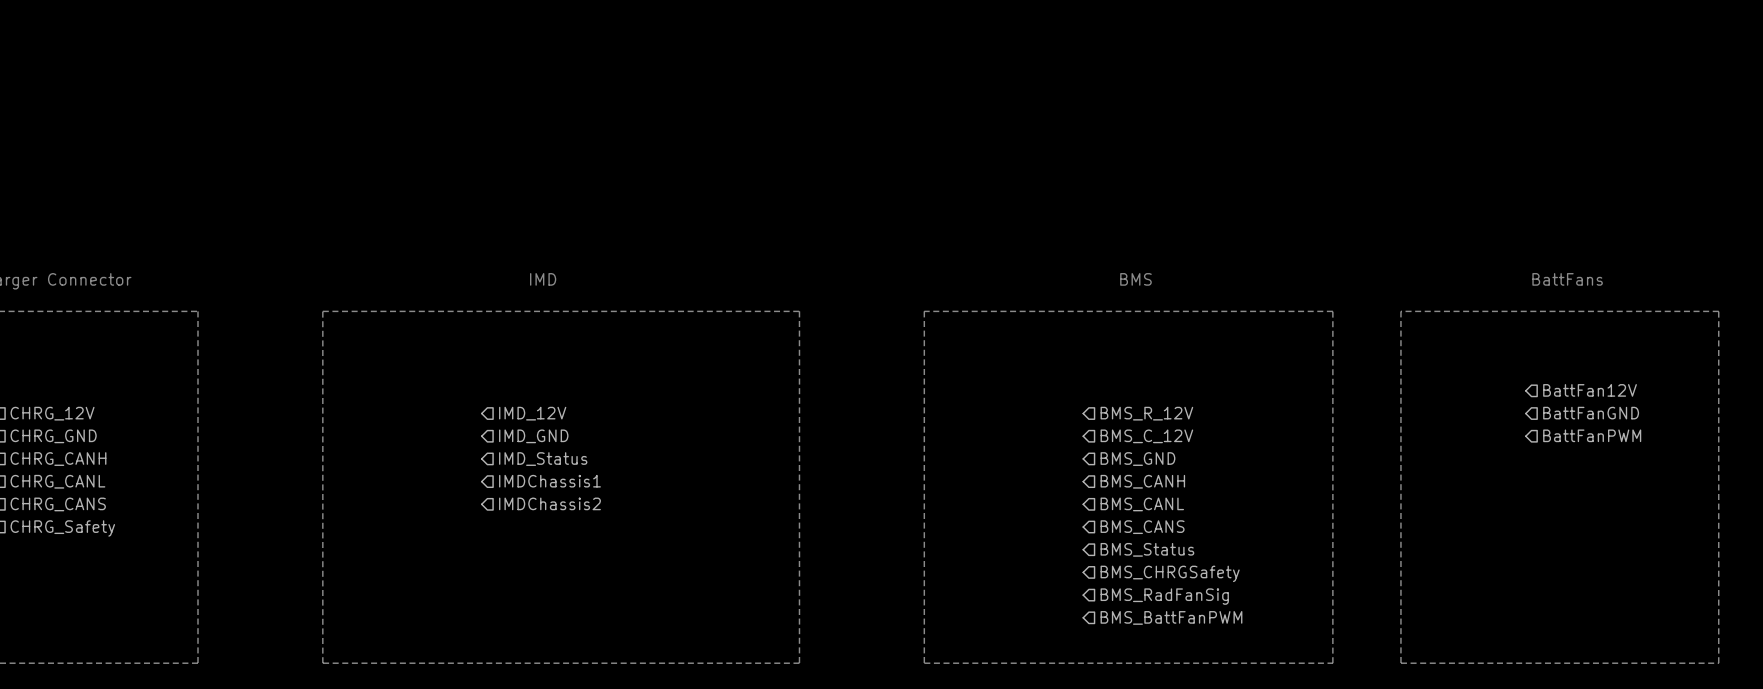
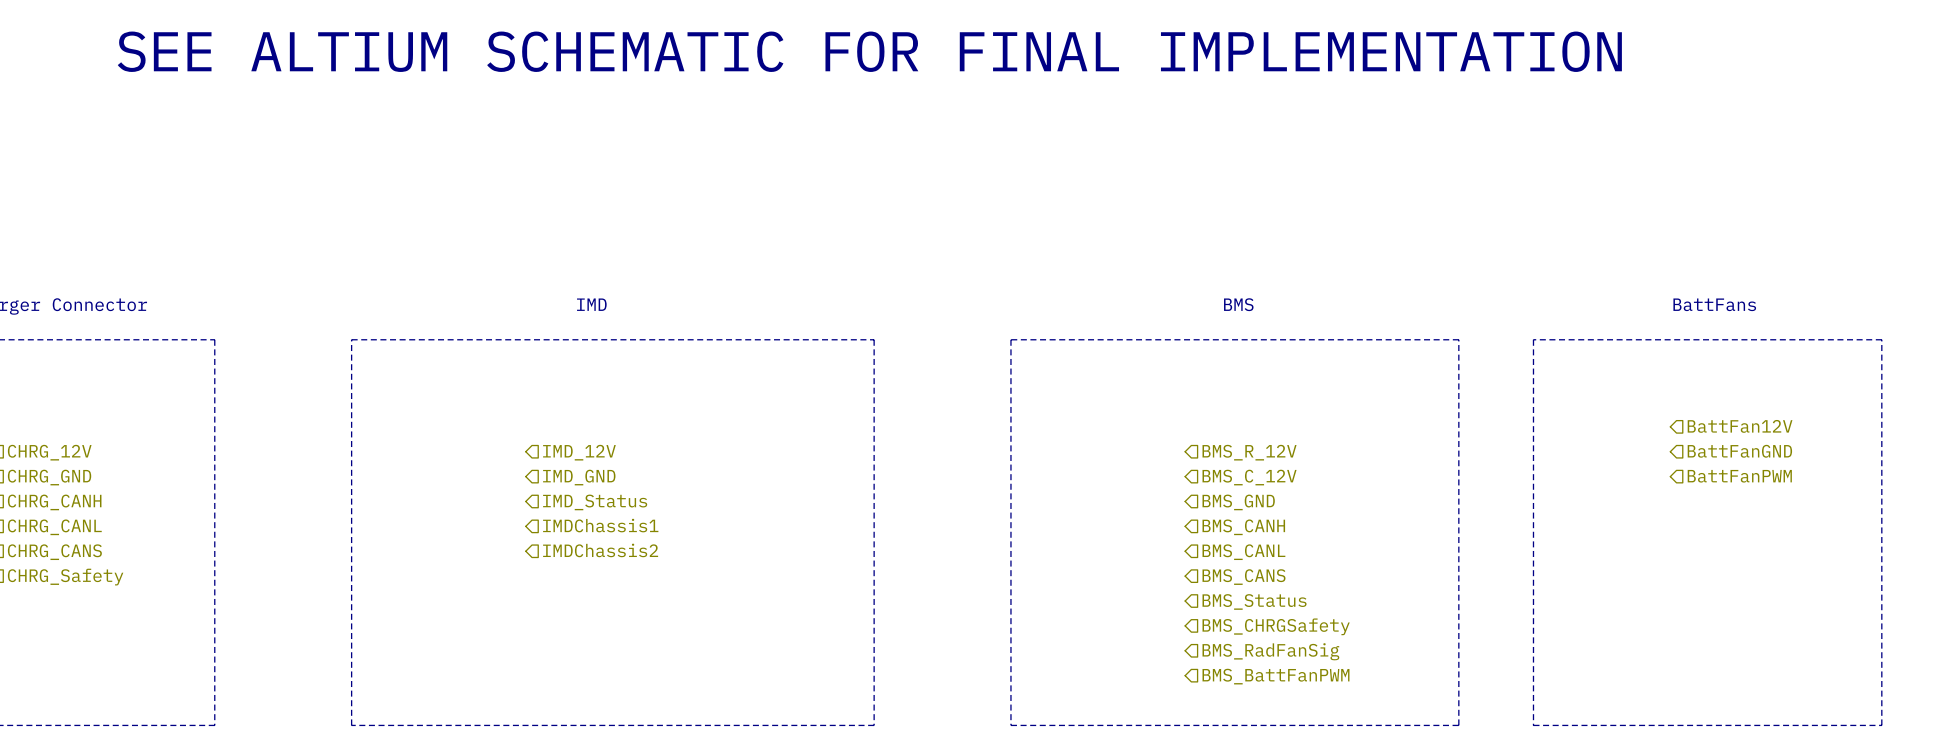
text: none -> SEE ALTIUM SCHEMATIC FOR FINAL IMPLEMENTATION (869, 51)

